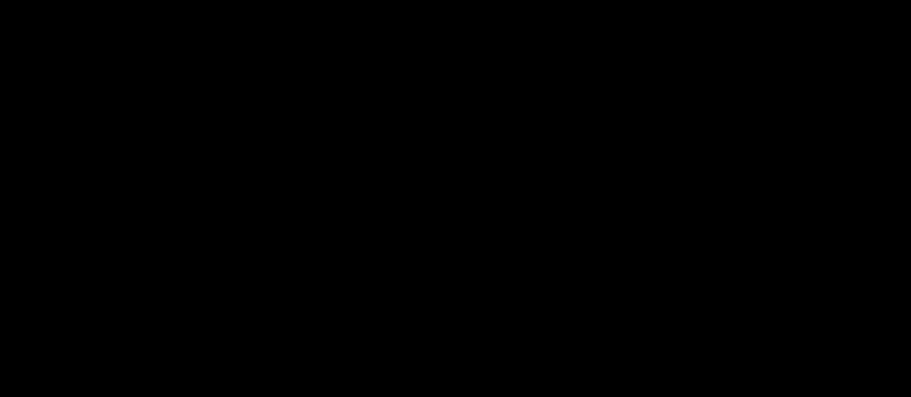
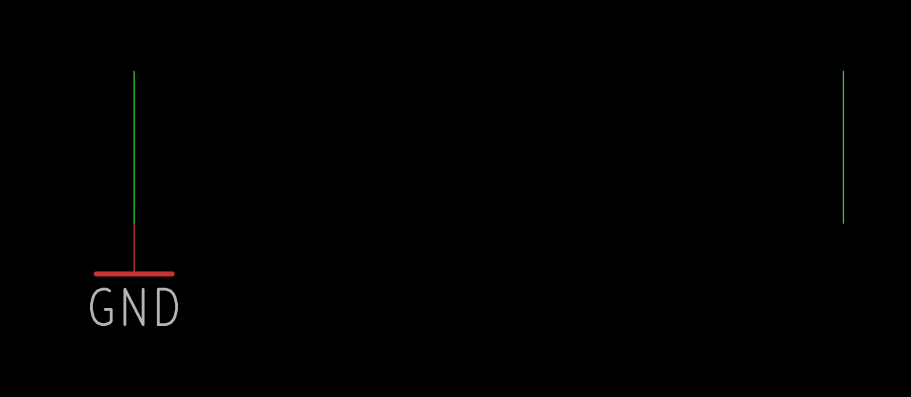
wire: none -> (134, 71) (134, 223)
wire: none -> (843, 71) (843, 223)
power symbol: none -> GND (134, 249)

